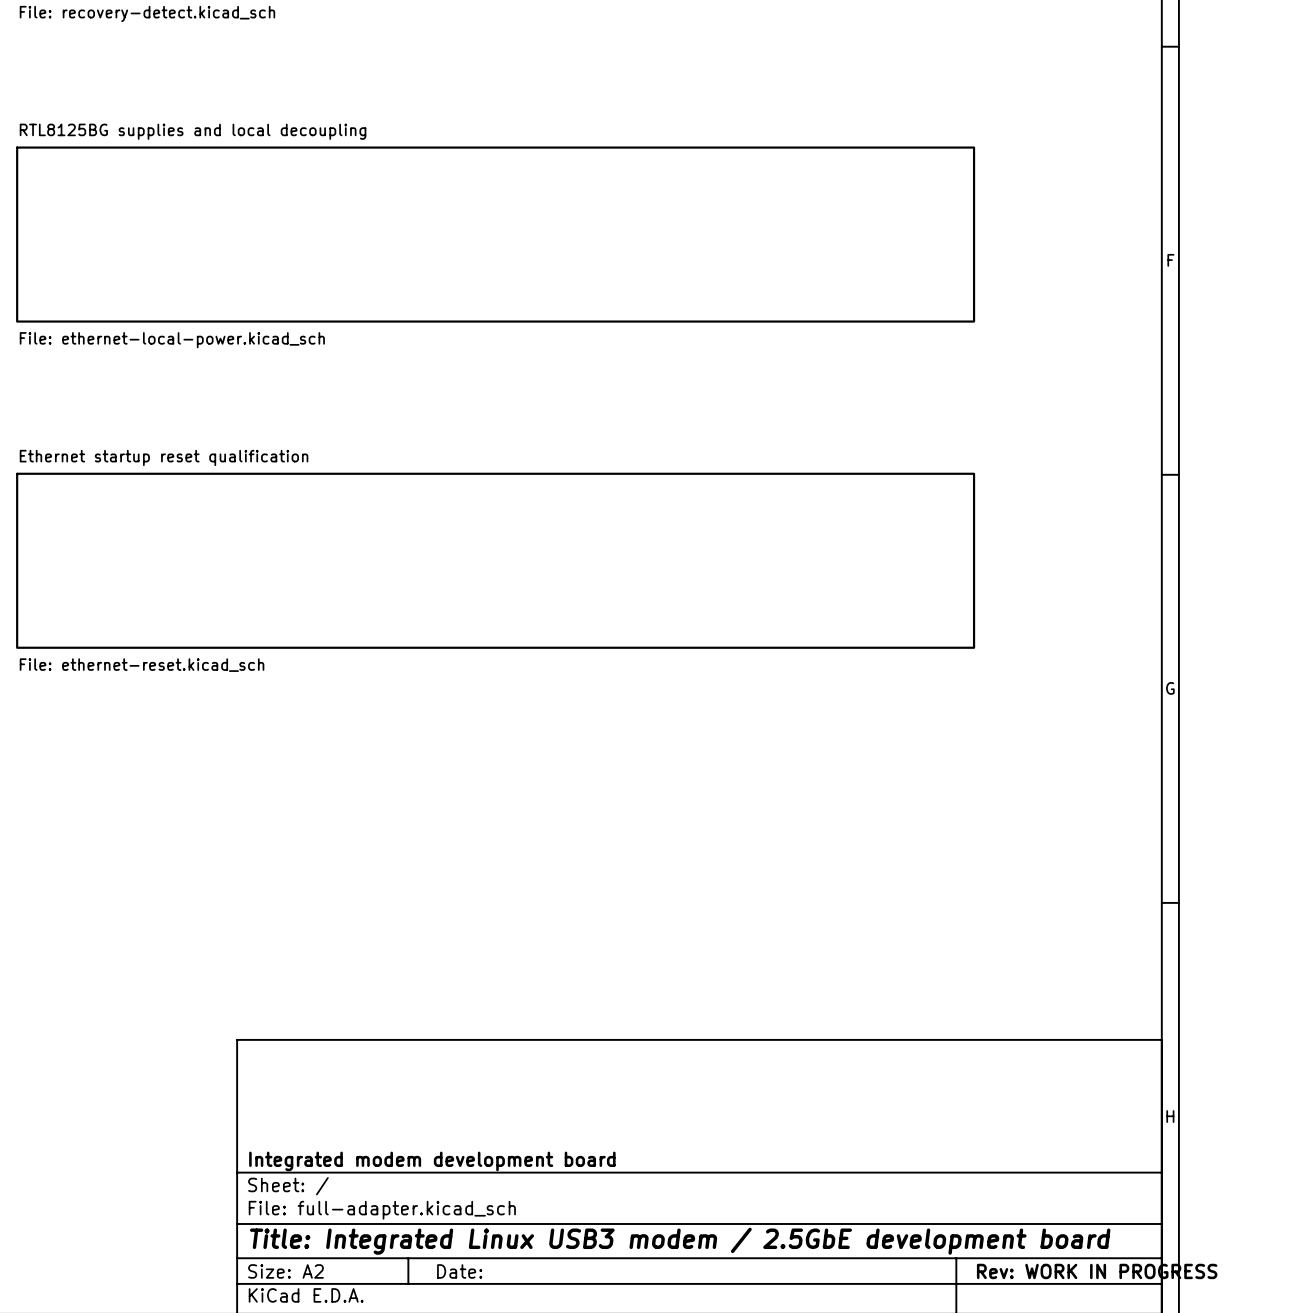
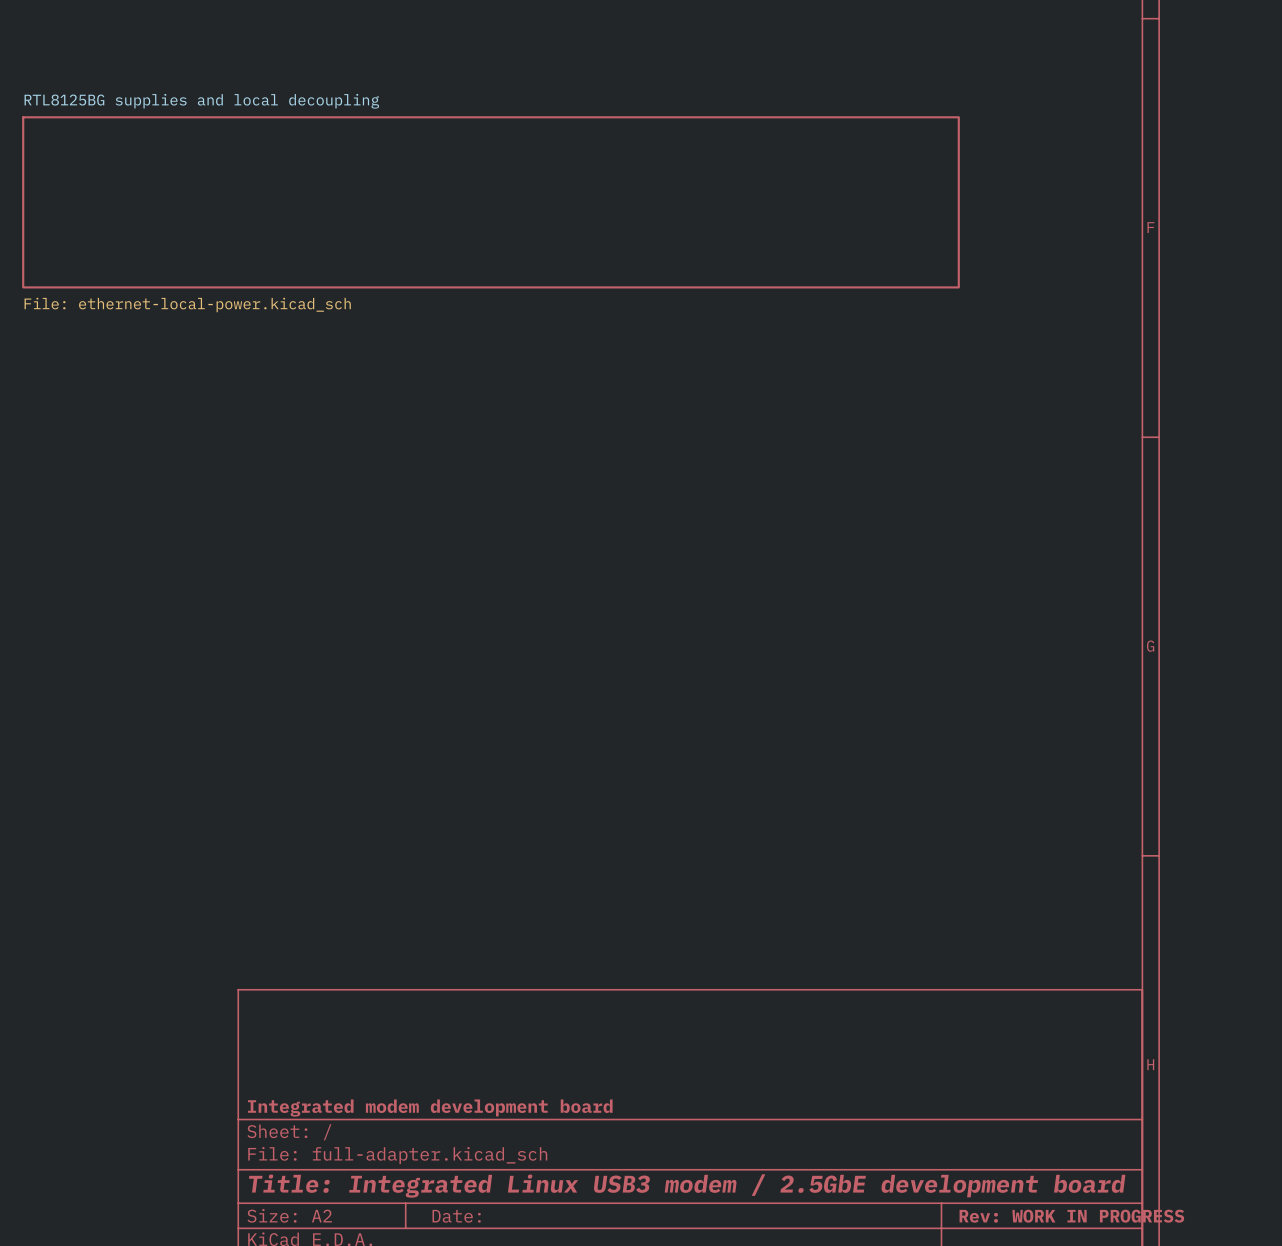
sheet Ethernet startup reset qualification: File: ethernet-reset.kicad_sch (495, 560) -> none

